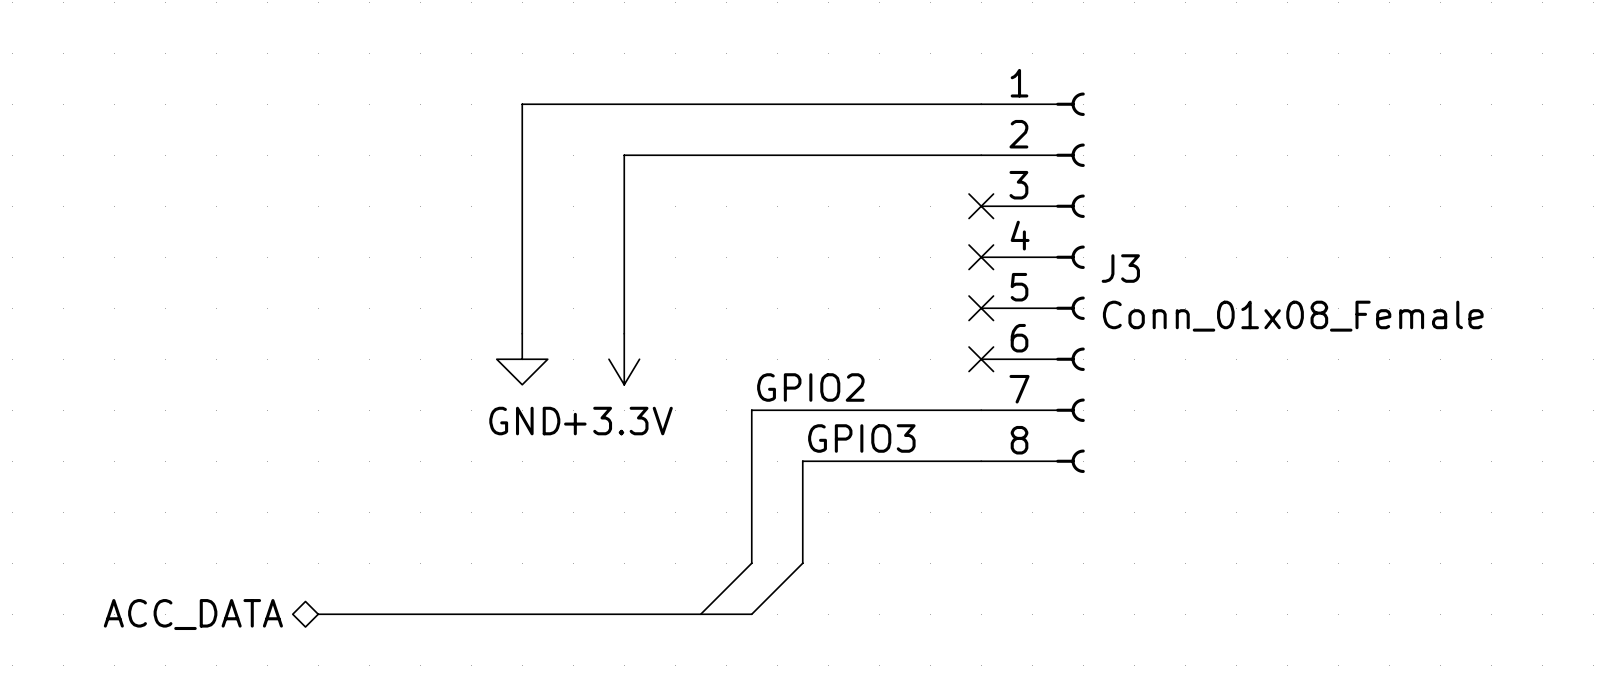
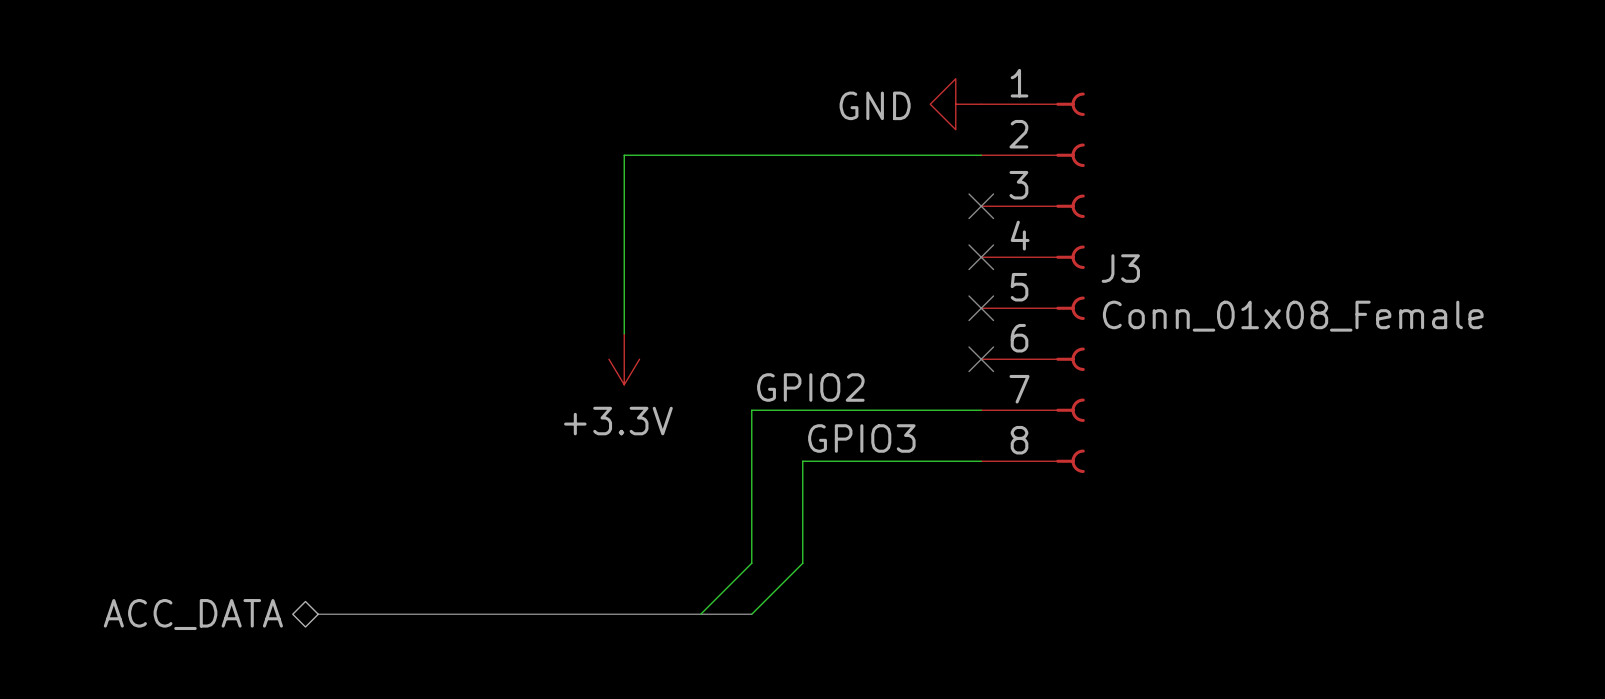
power symbol: none -> GND (955, 104)
wire: (981, 104) (522, 104) (522, 333) -> none
power symbol: GND (522, 359) -> none

